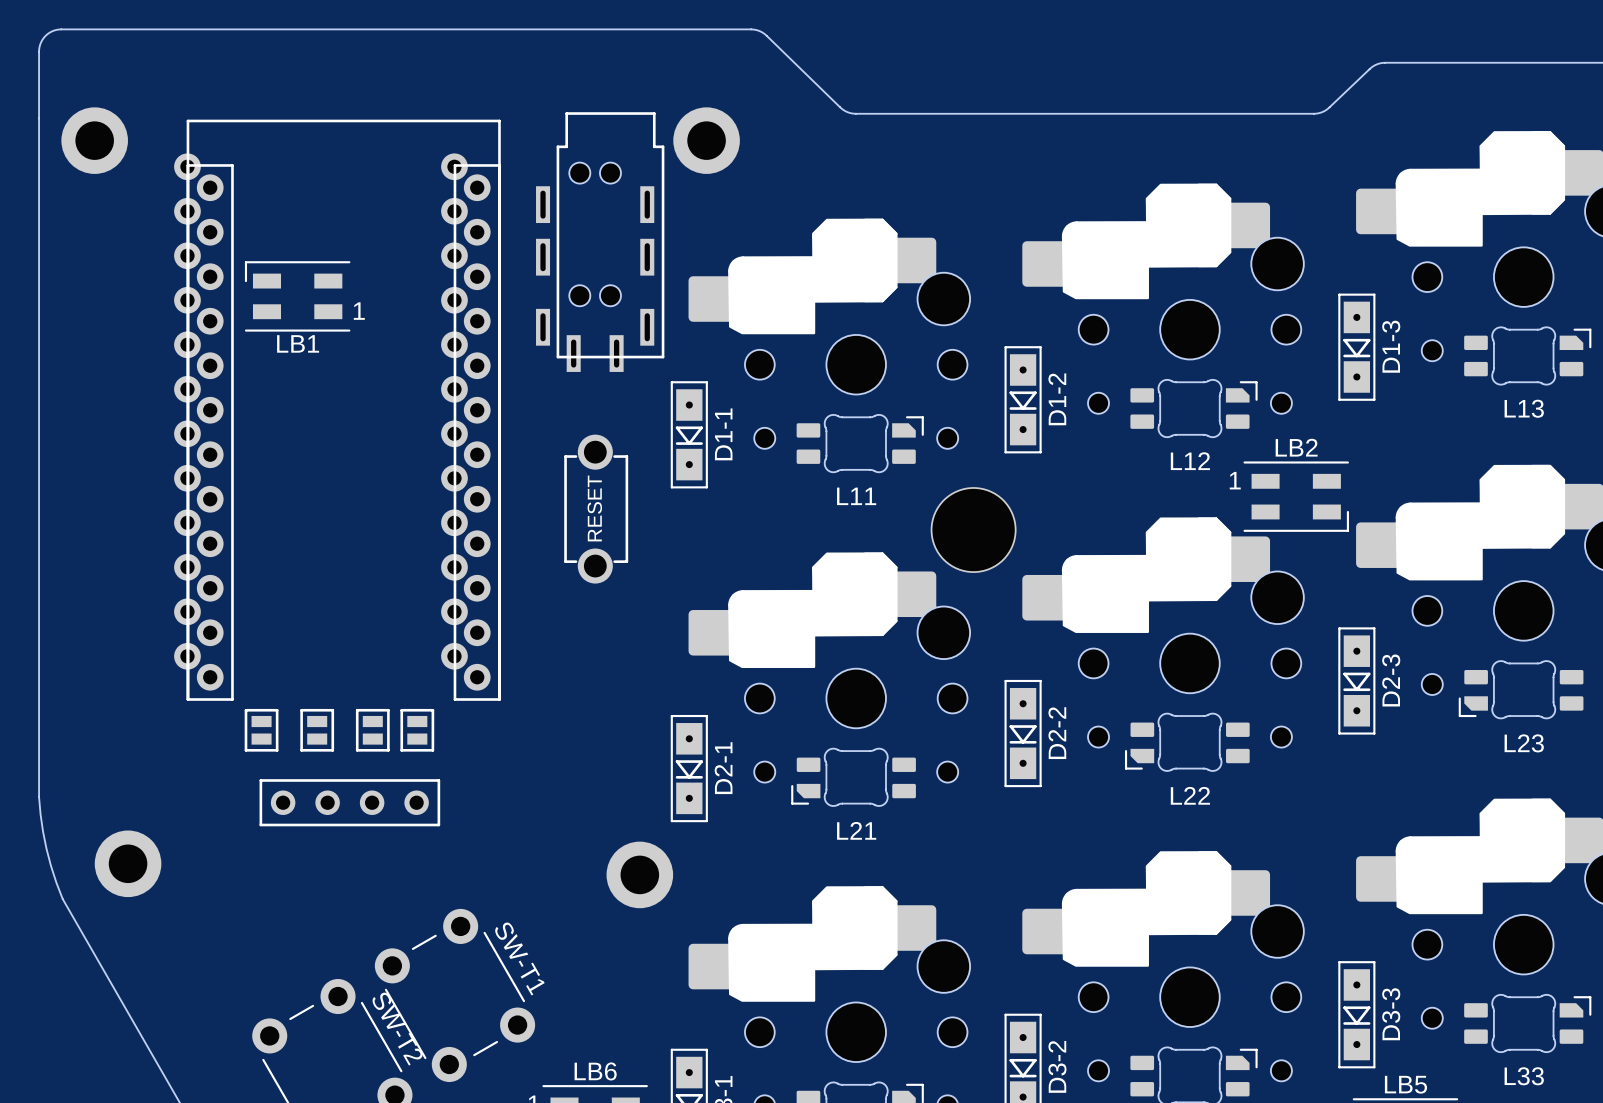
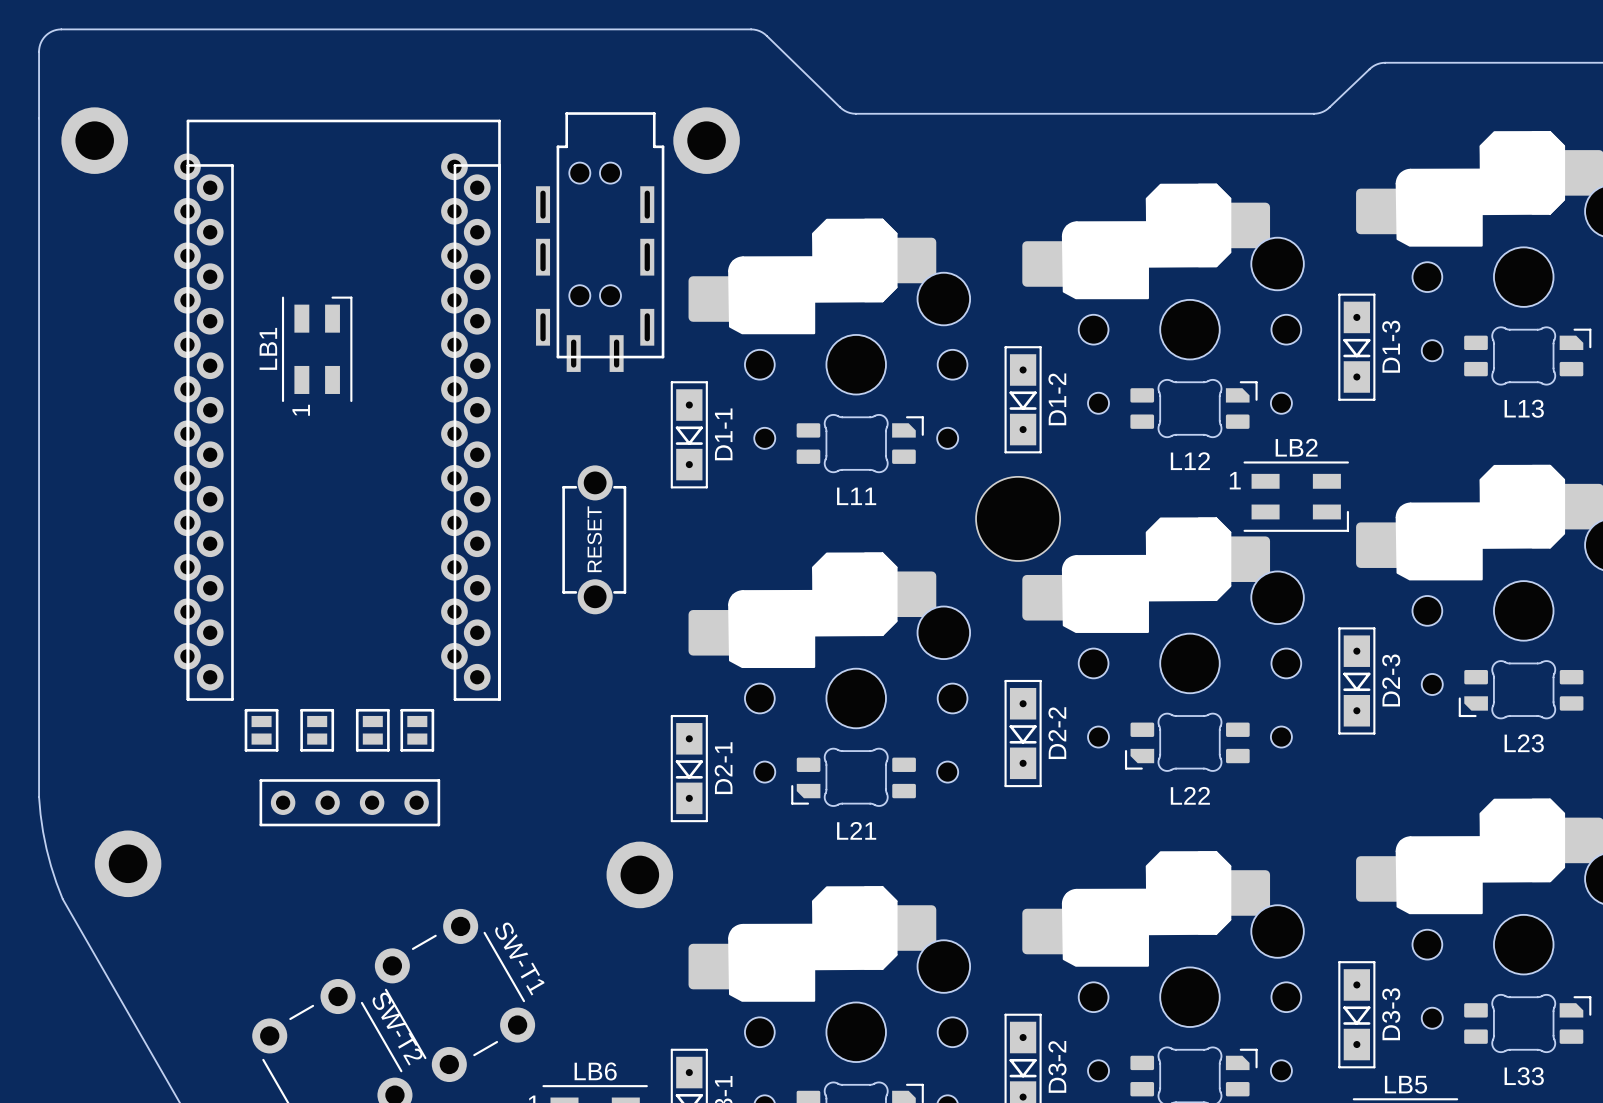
LB1 rotation: 0° (297, 296) -> 90° clockwise (317, 349)
part rotation: 0° (596, 509) -> 180° (594, 539)
part position: (973, 530) -> (1018, 518)

